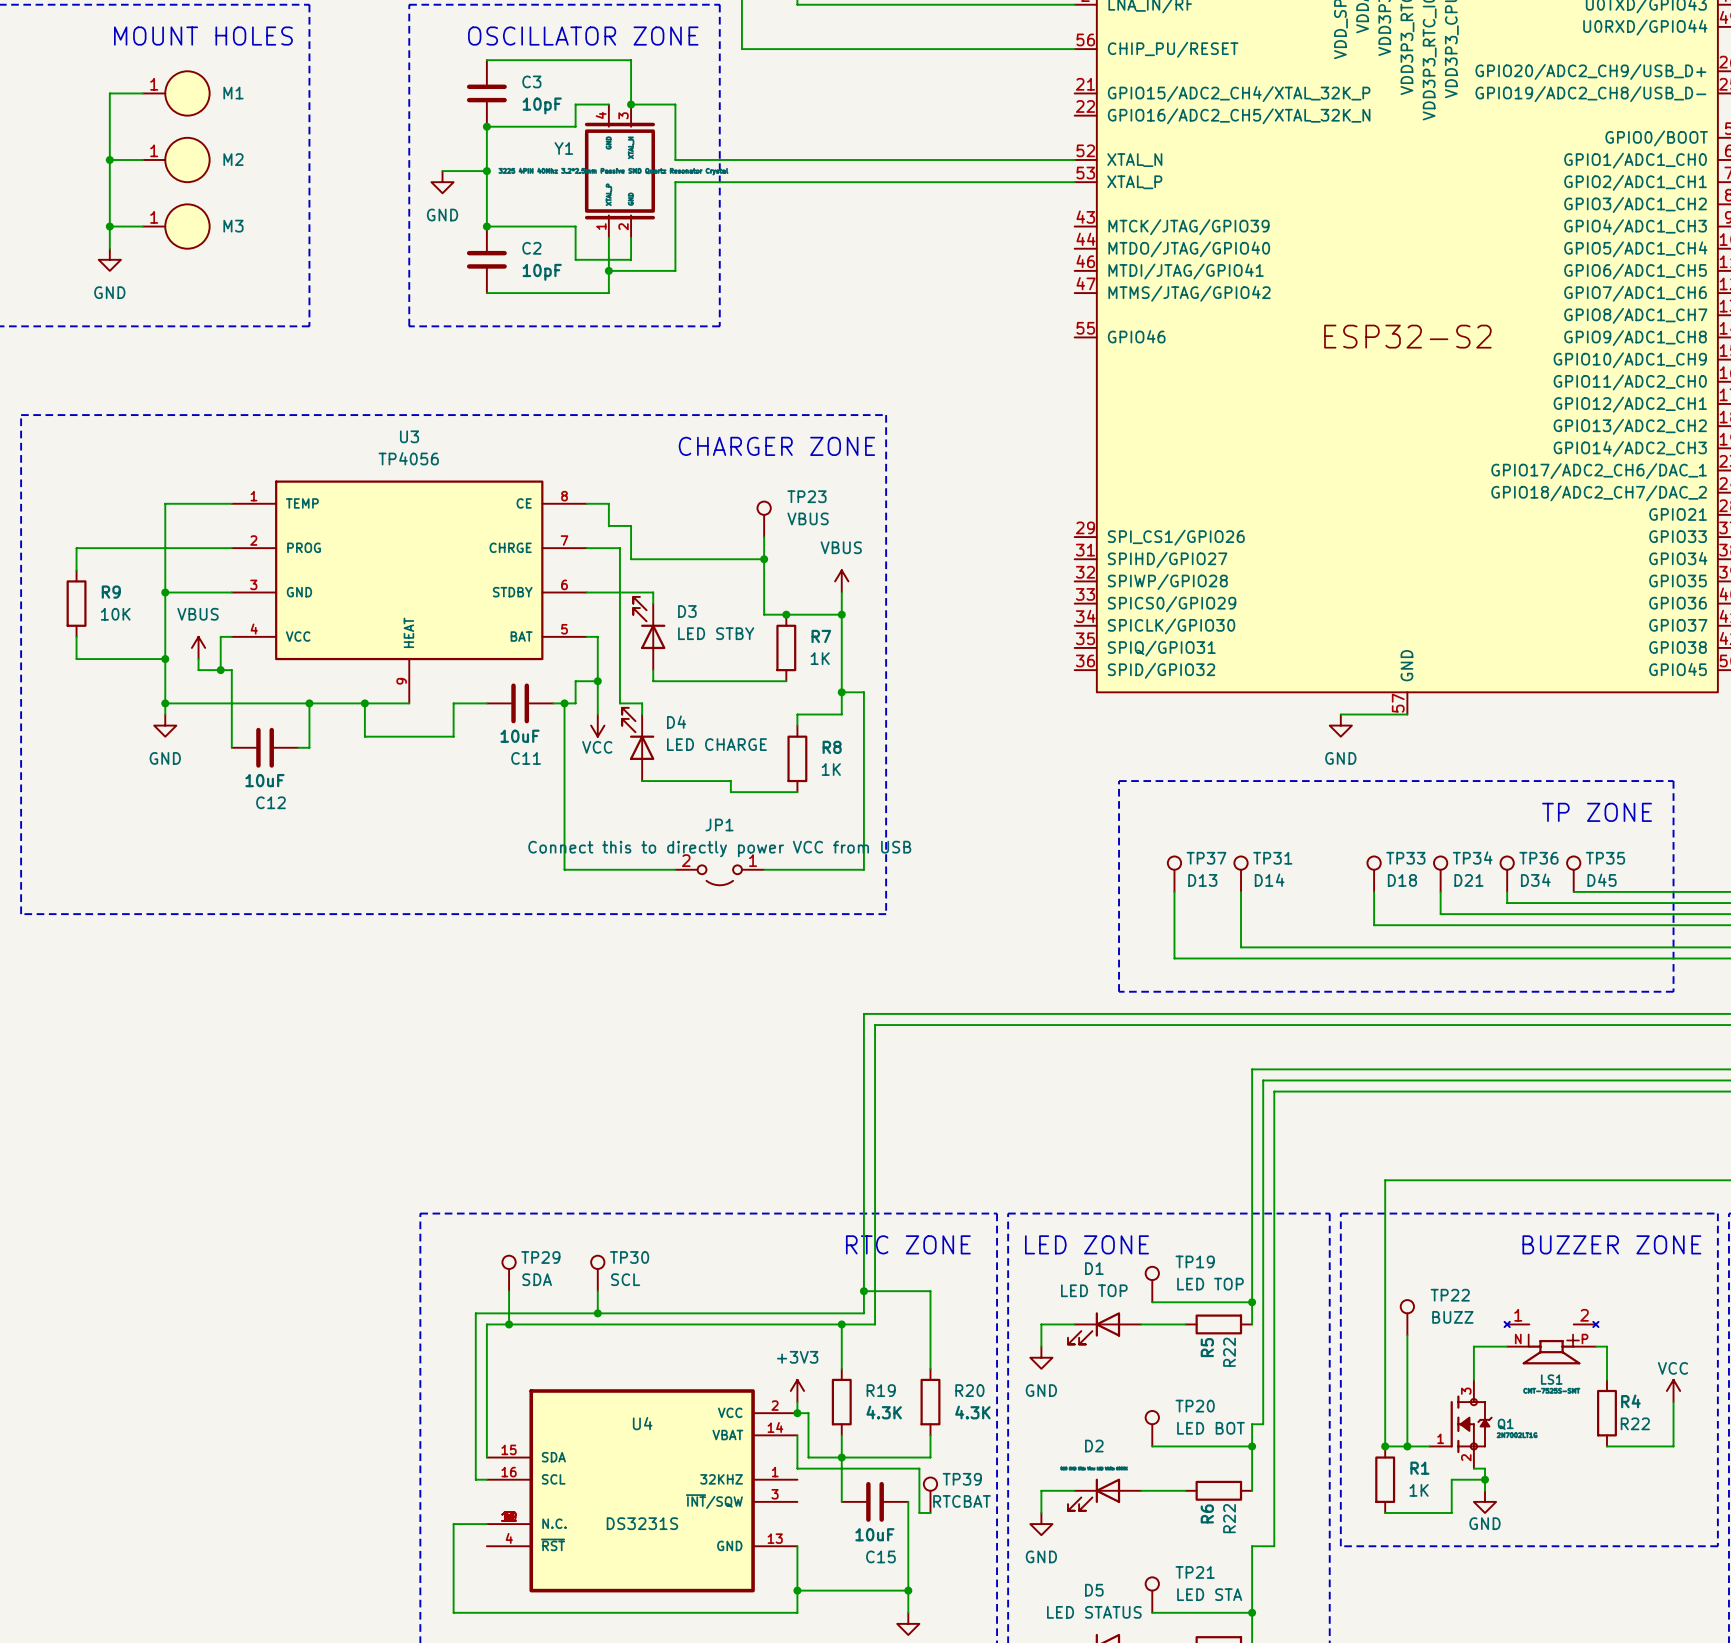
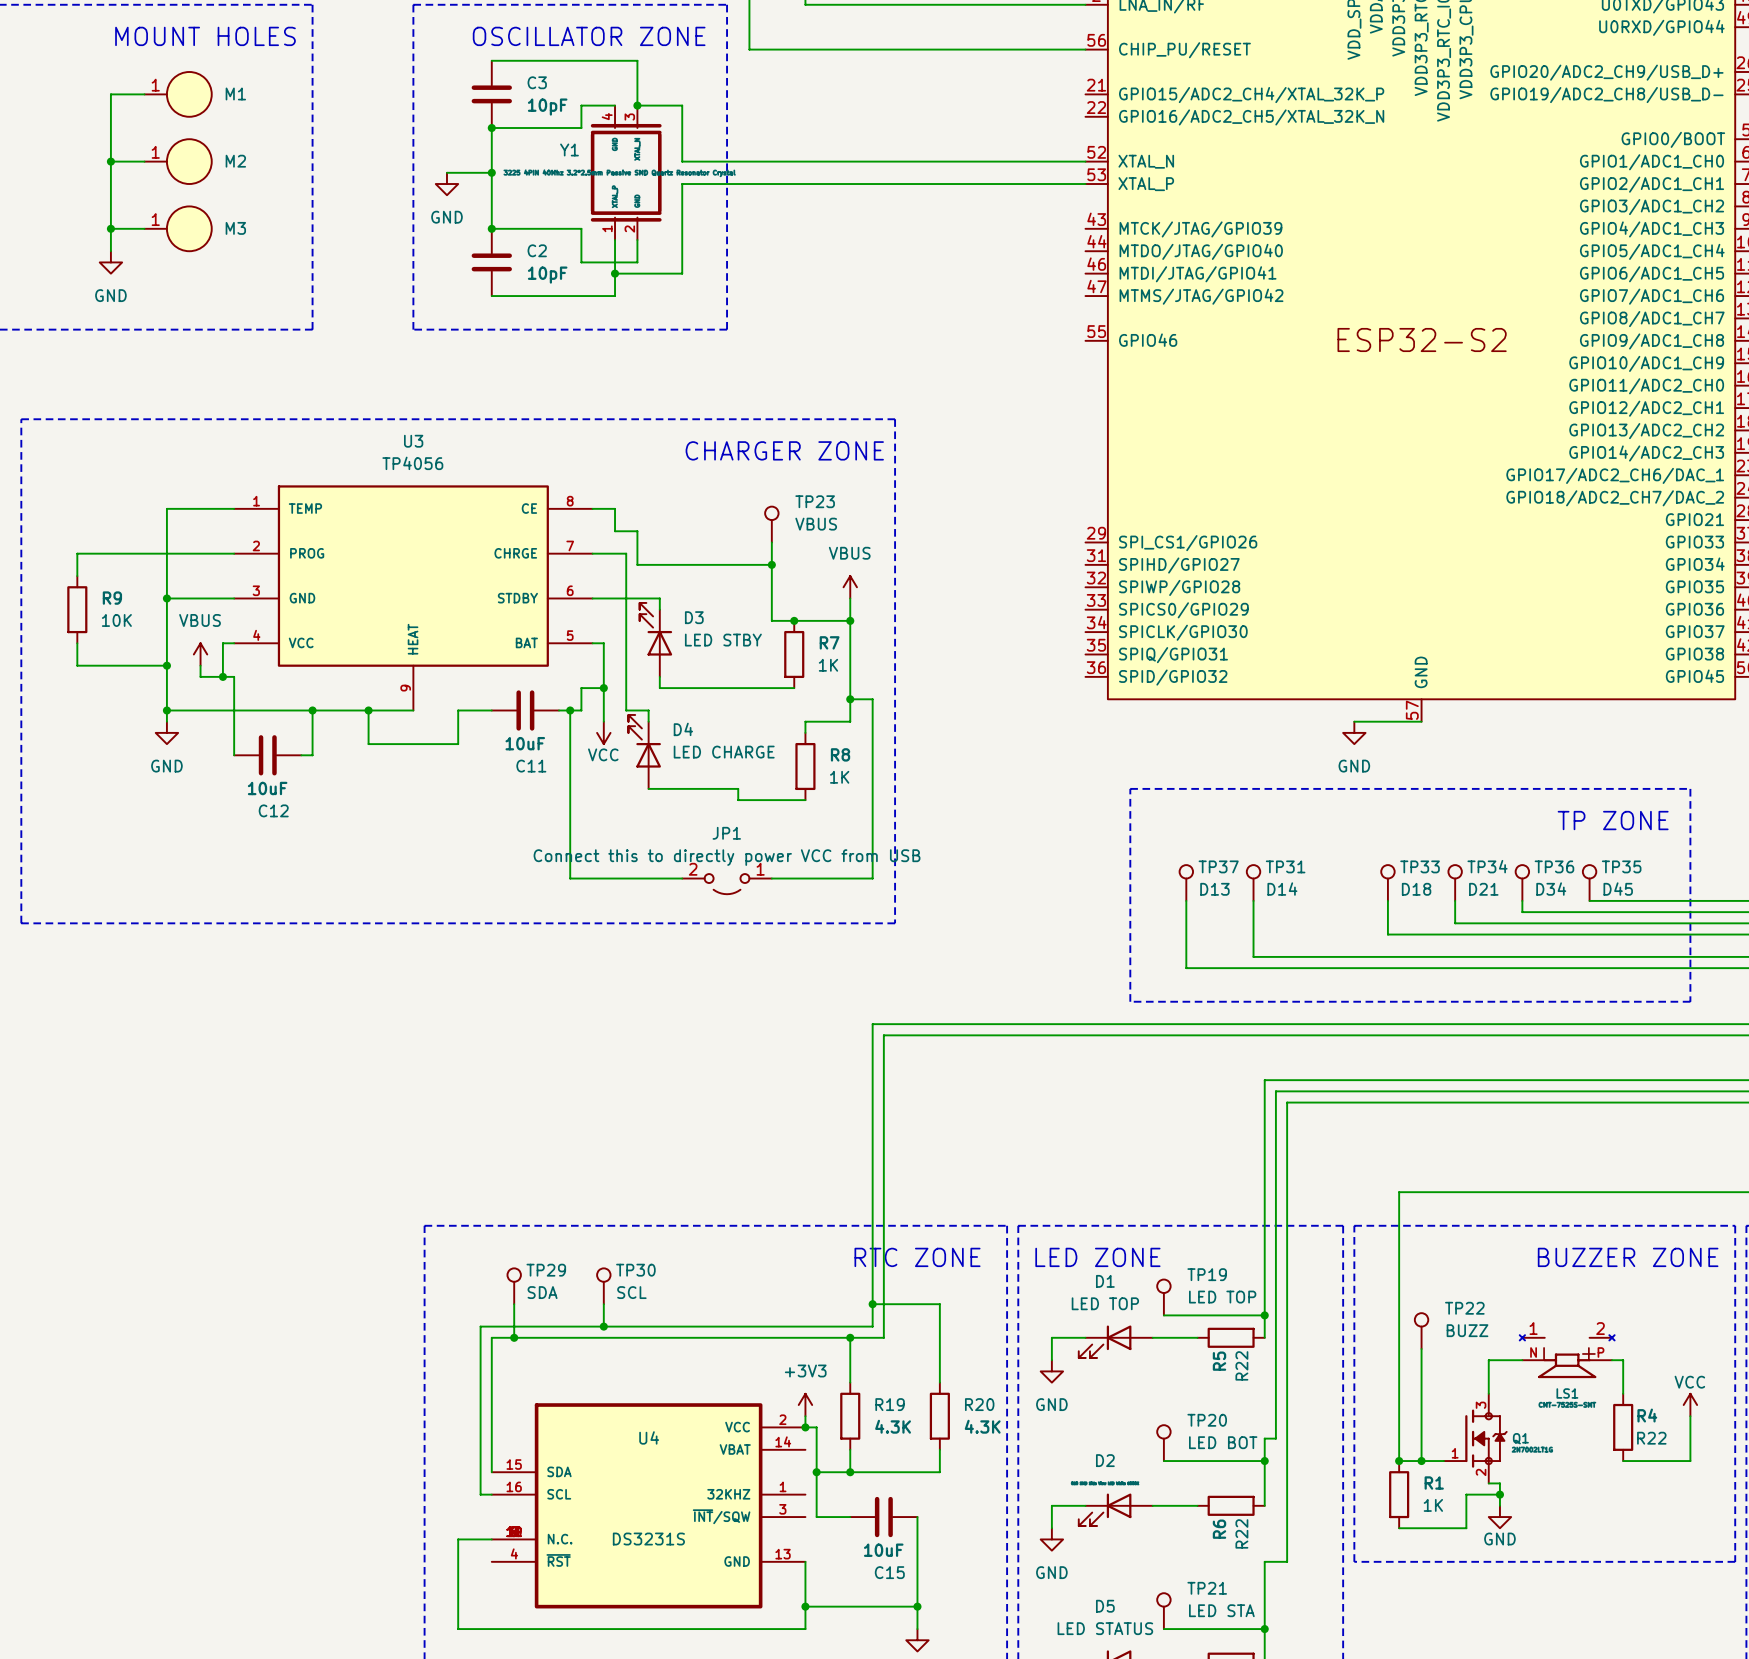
wire: (797, 1435) (797, 1468) (919, 1468) (919, 1512) (930, 1512) -> none
junction: none -> (816, 1472)
wire: (841, 1457) (841, 1501) -> (816, 1472) (816, 1517) (850, 1517)
TP39: RTCBAT (930, 1495) -> none

